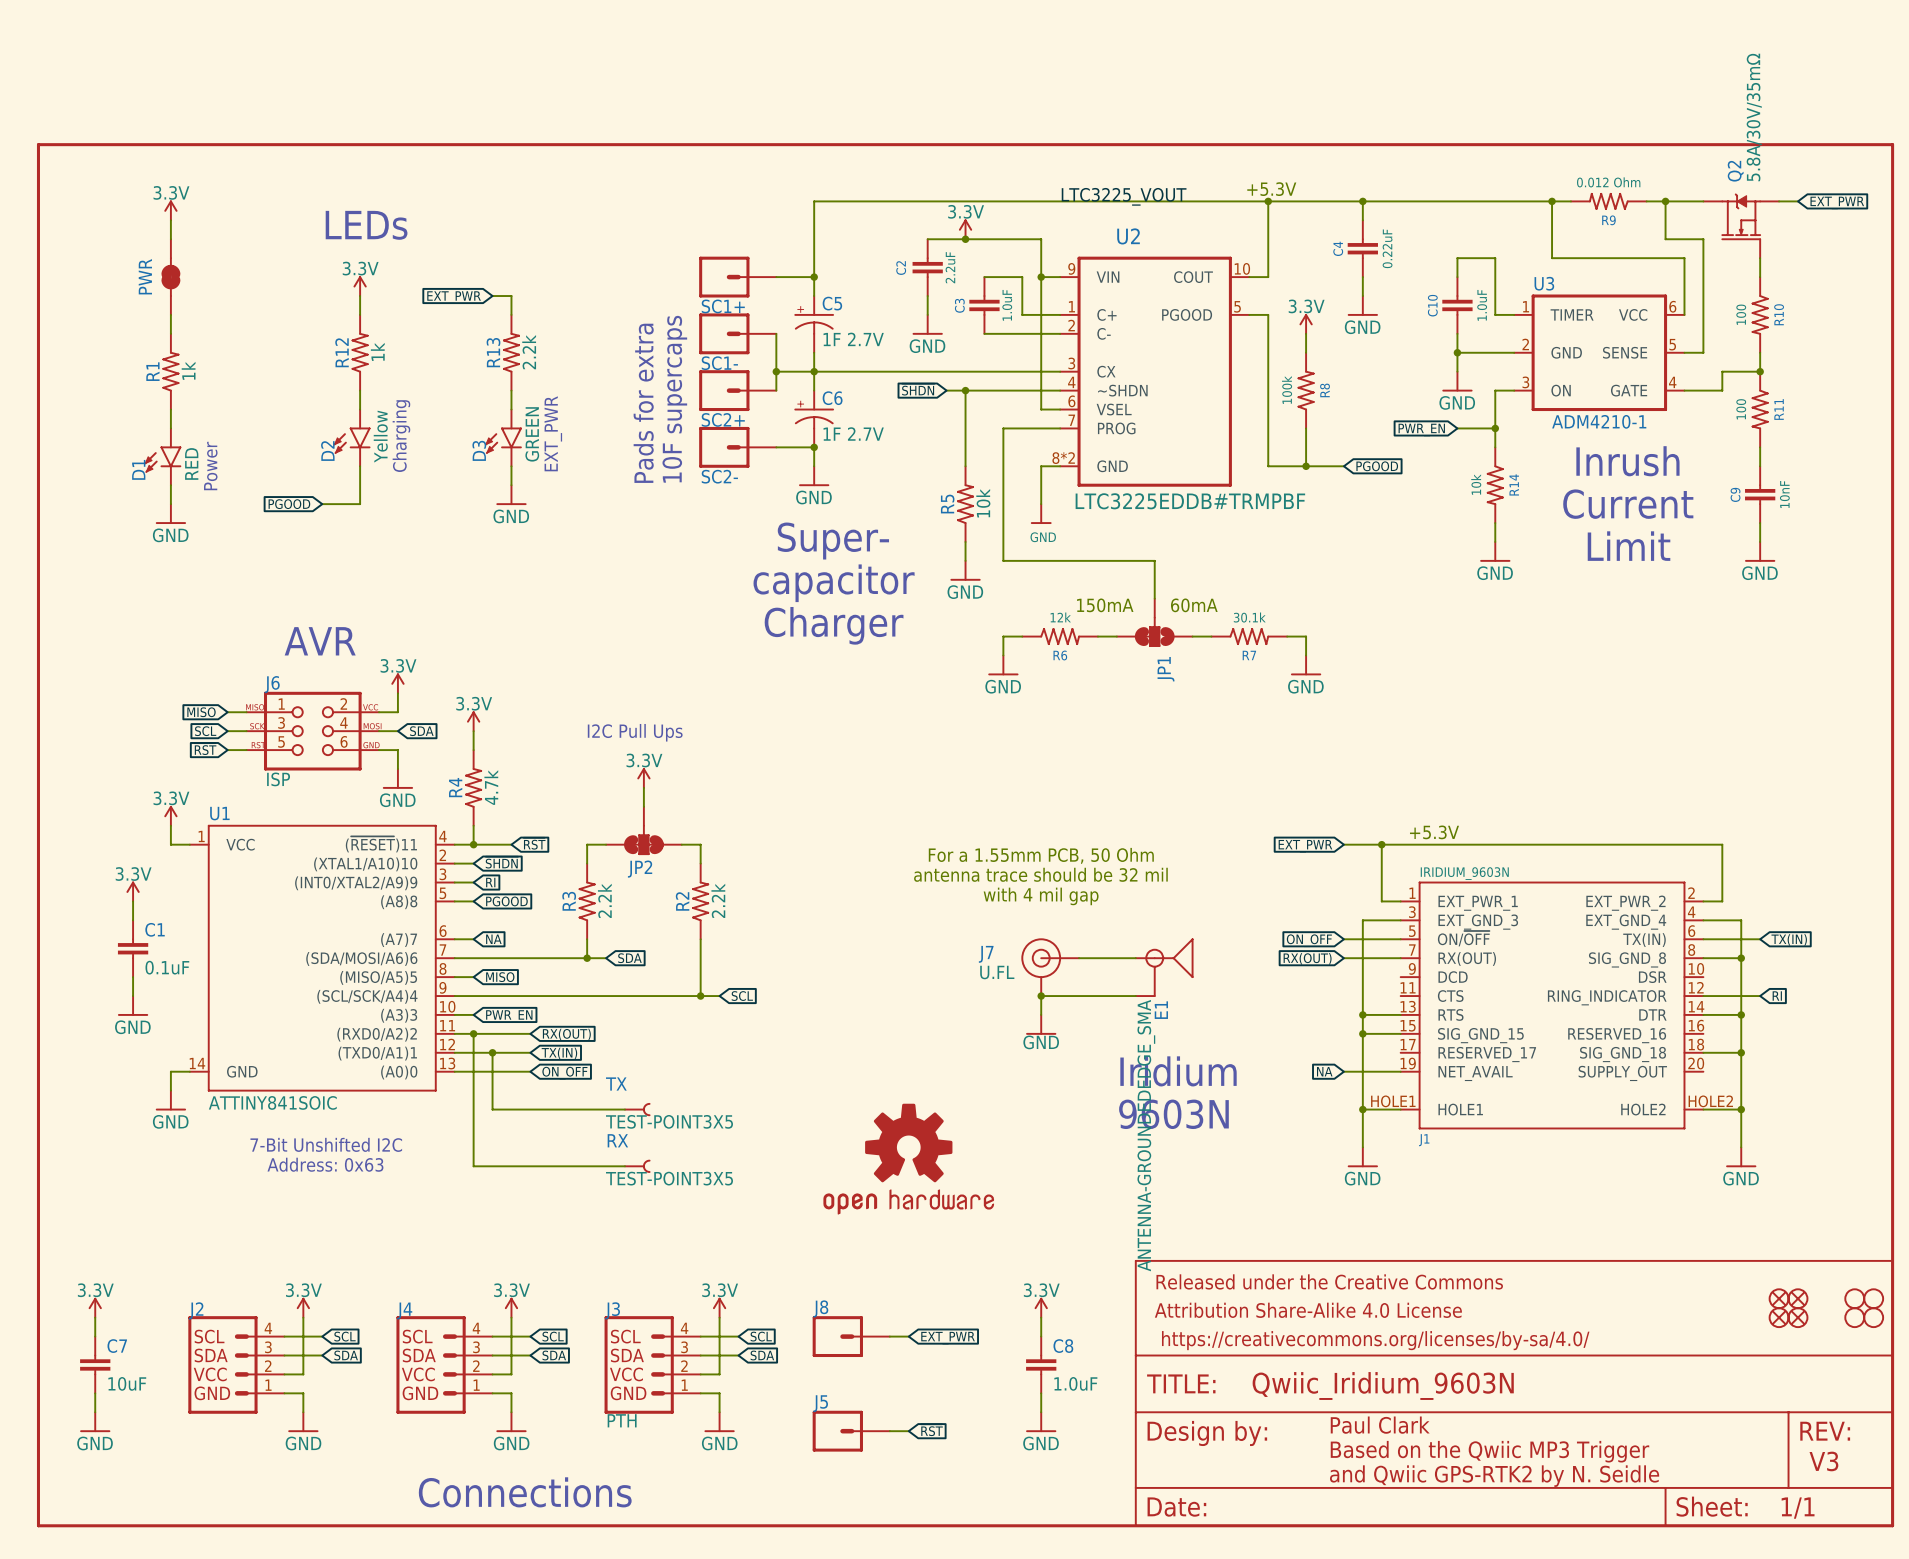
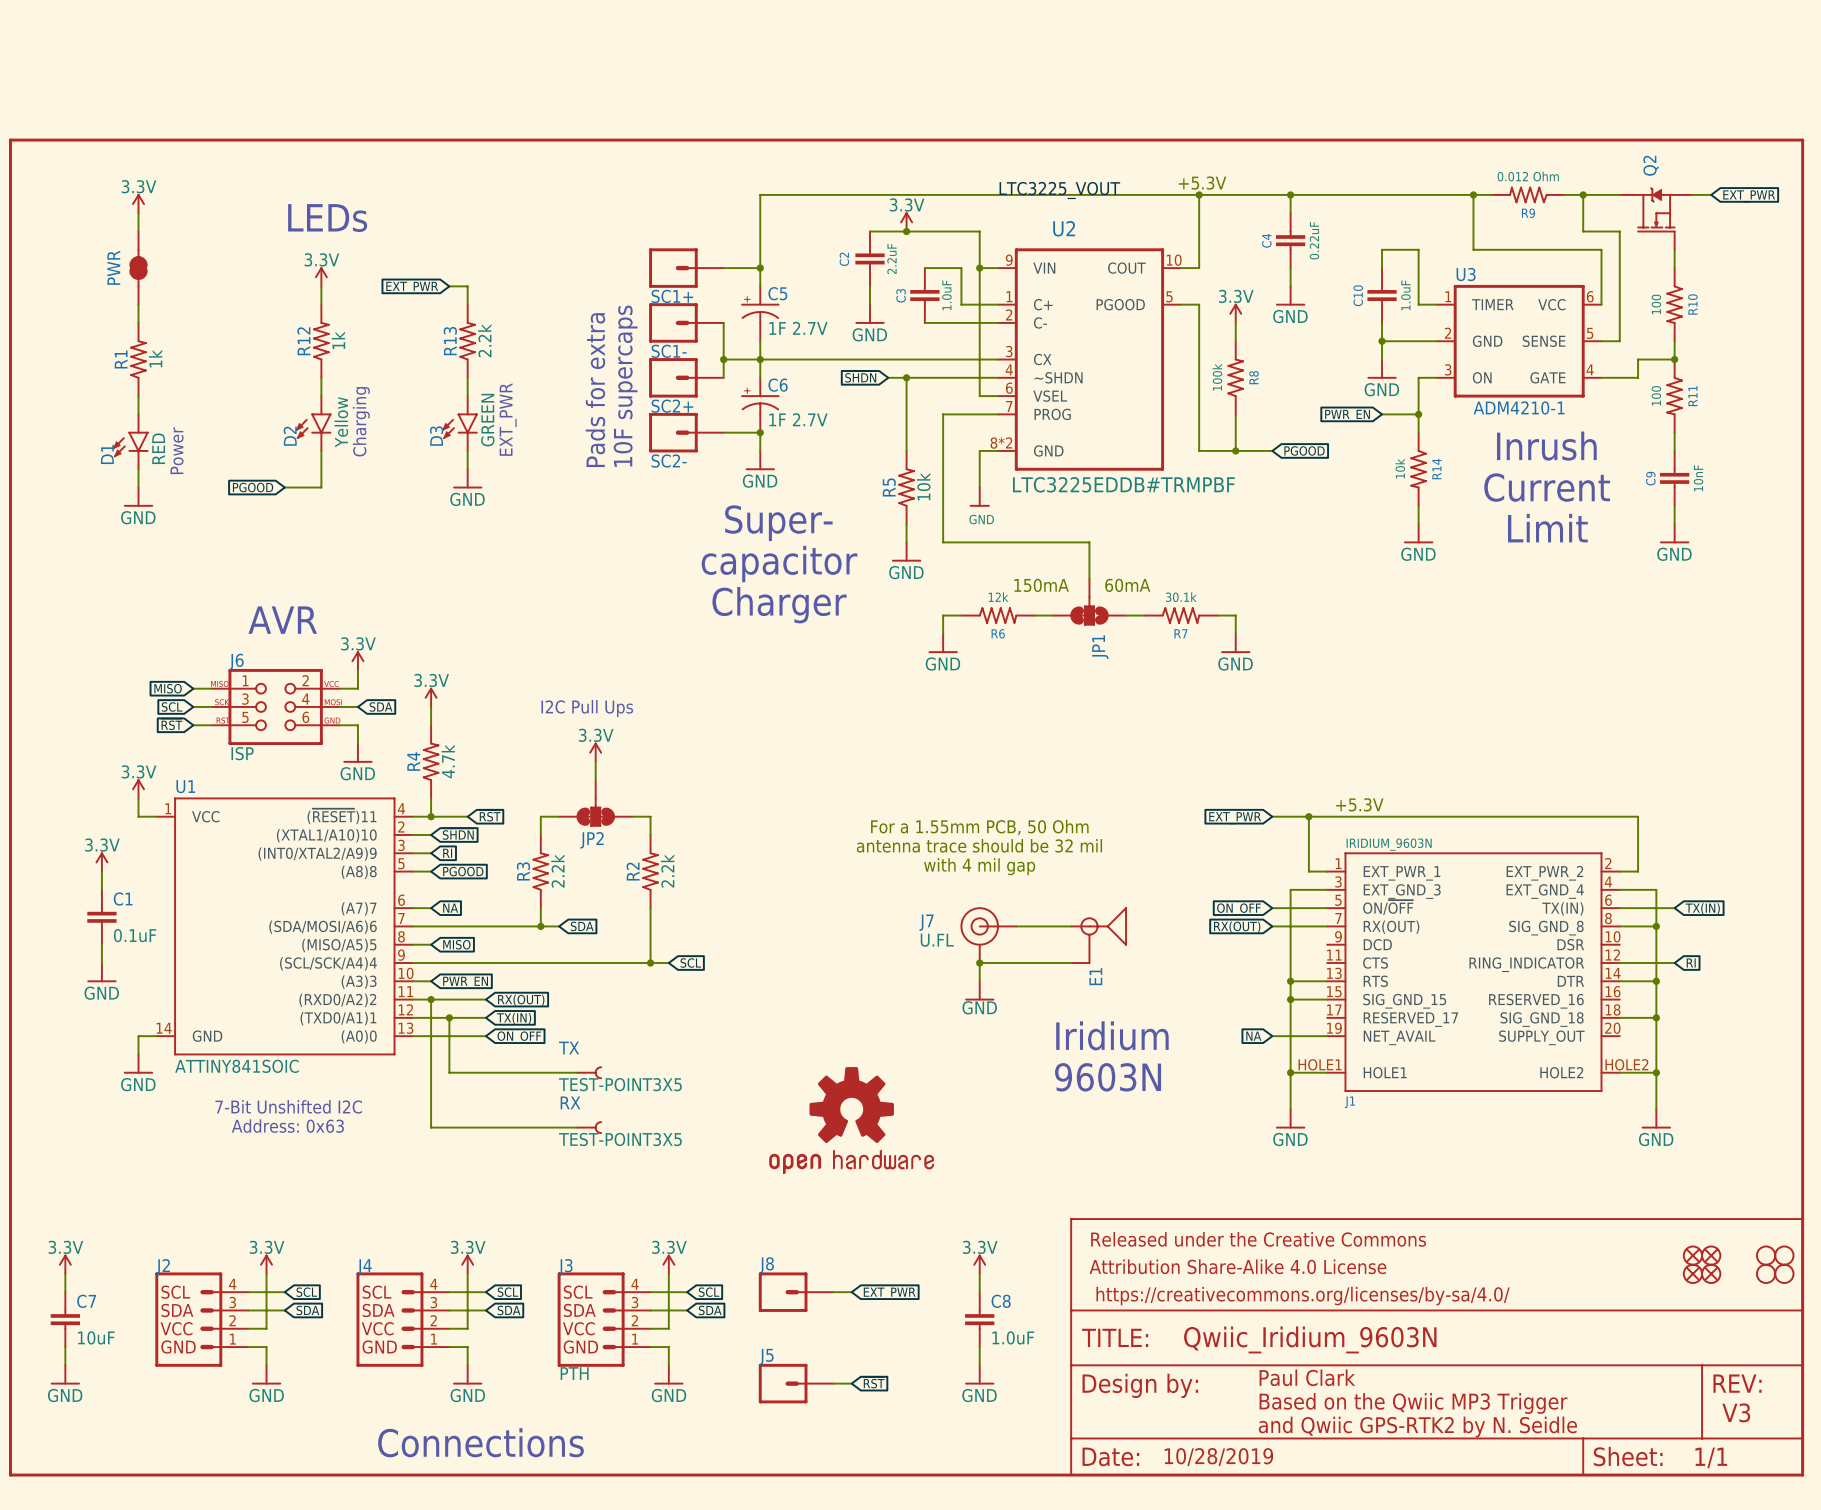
Q2 value: 5.8A/30V/35mΩ (1754, 117) -> none
E1 value: ANTENNA-GROUNDEDEDGE_SMA (1146, 1135) -> none
text: none -> 10/28/2019 (1218, 1457)

